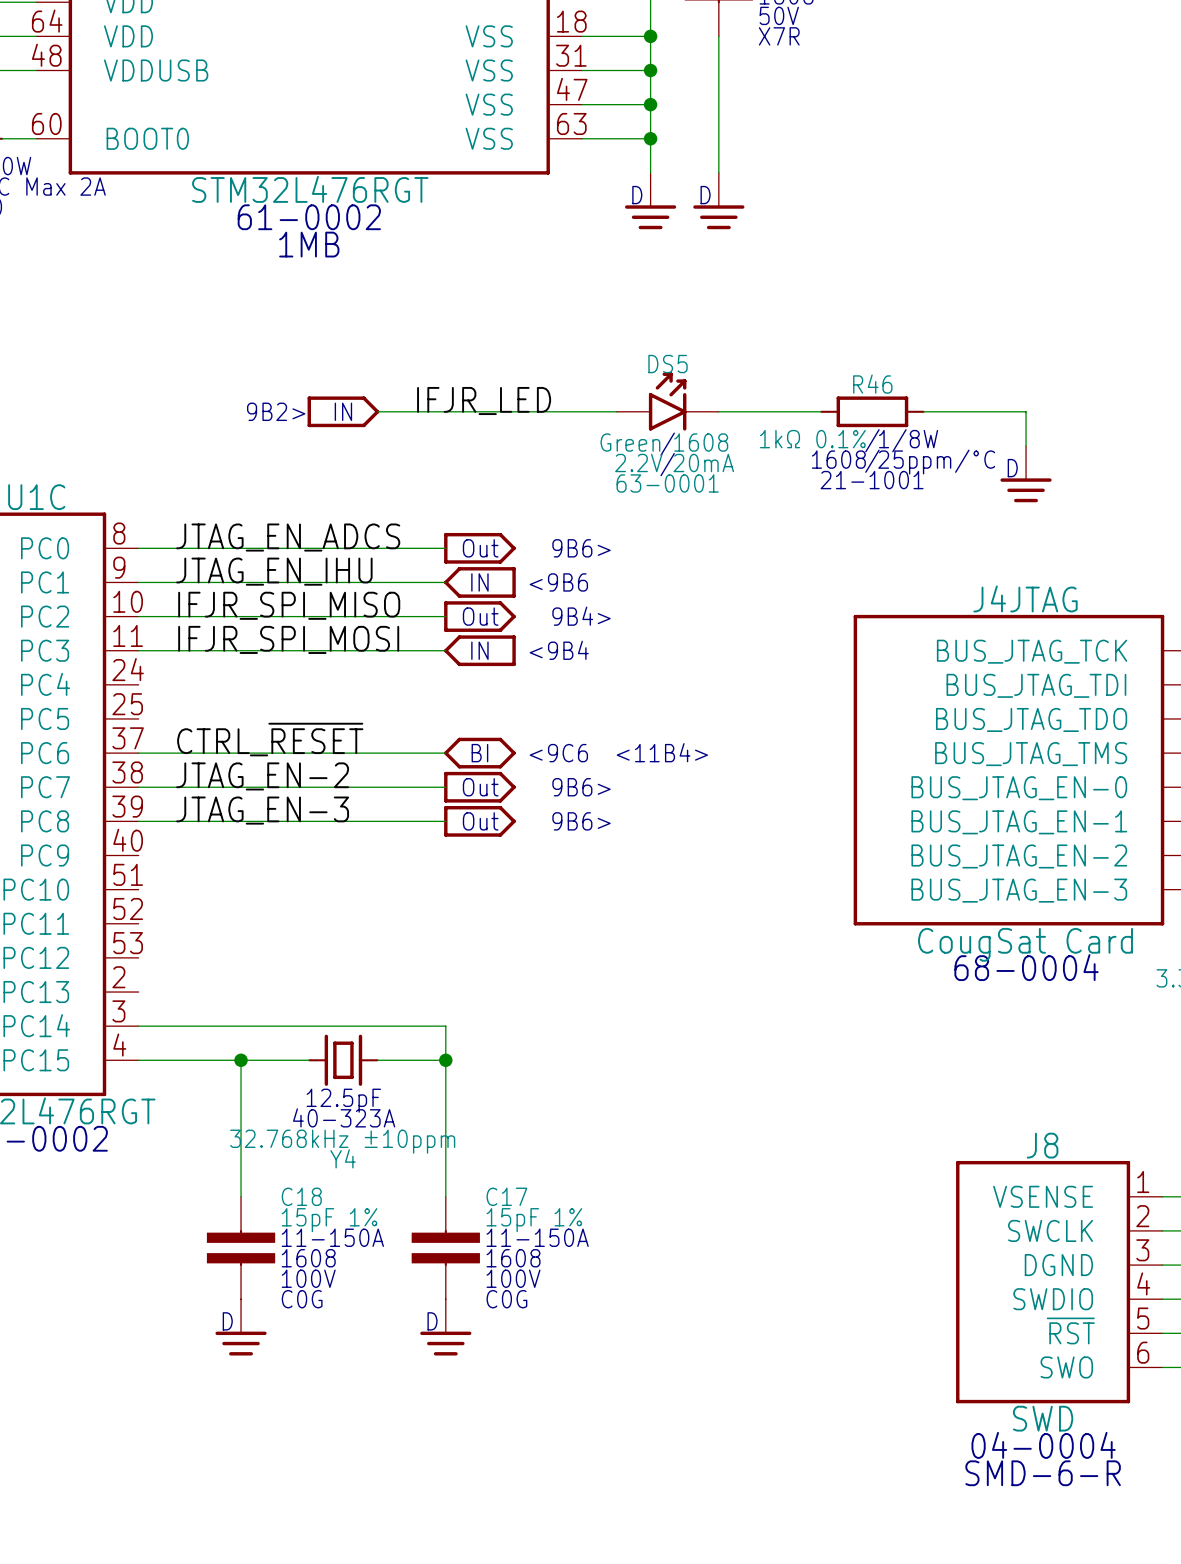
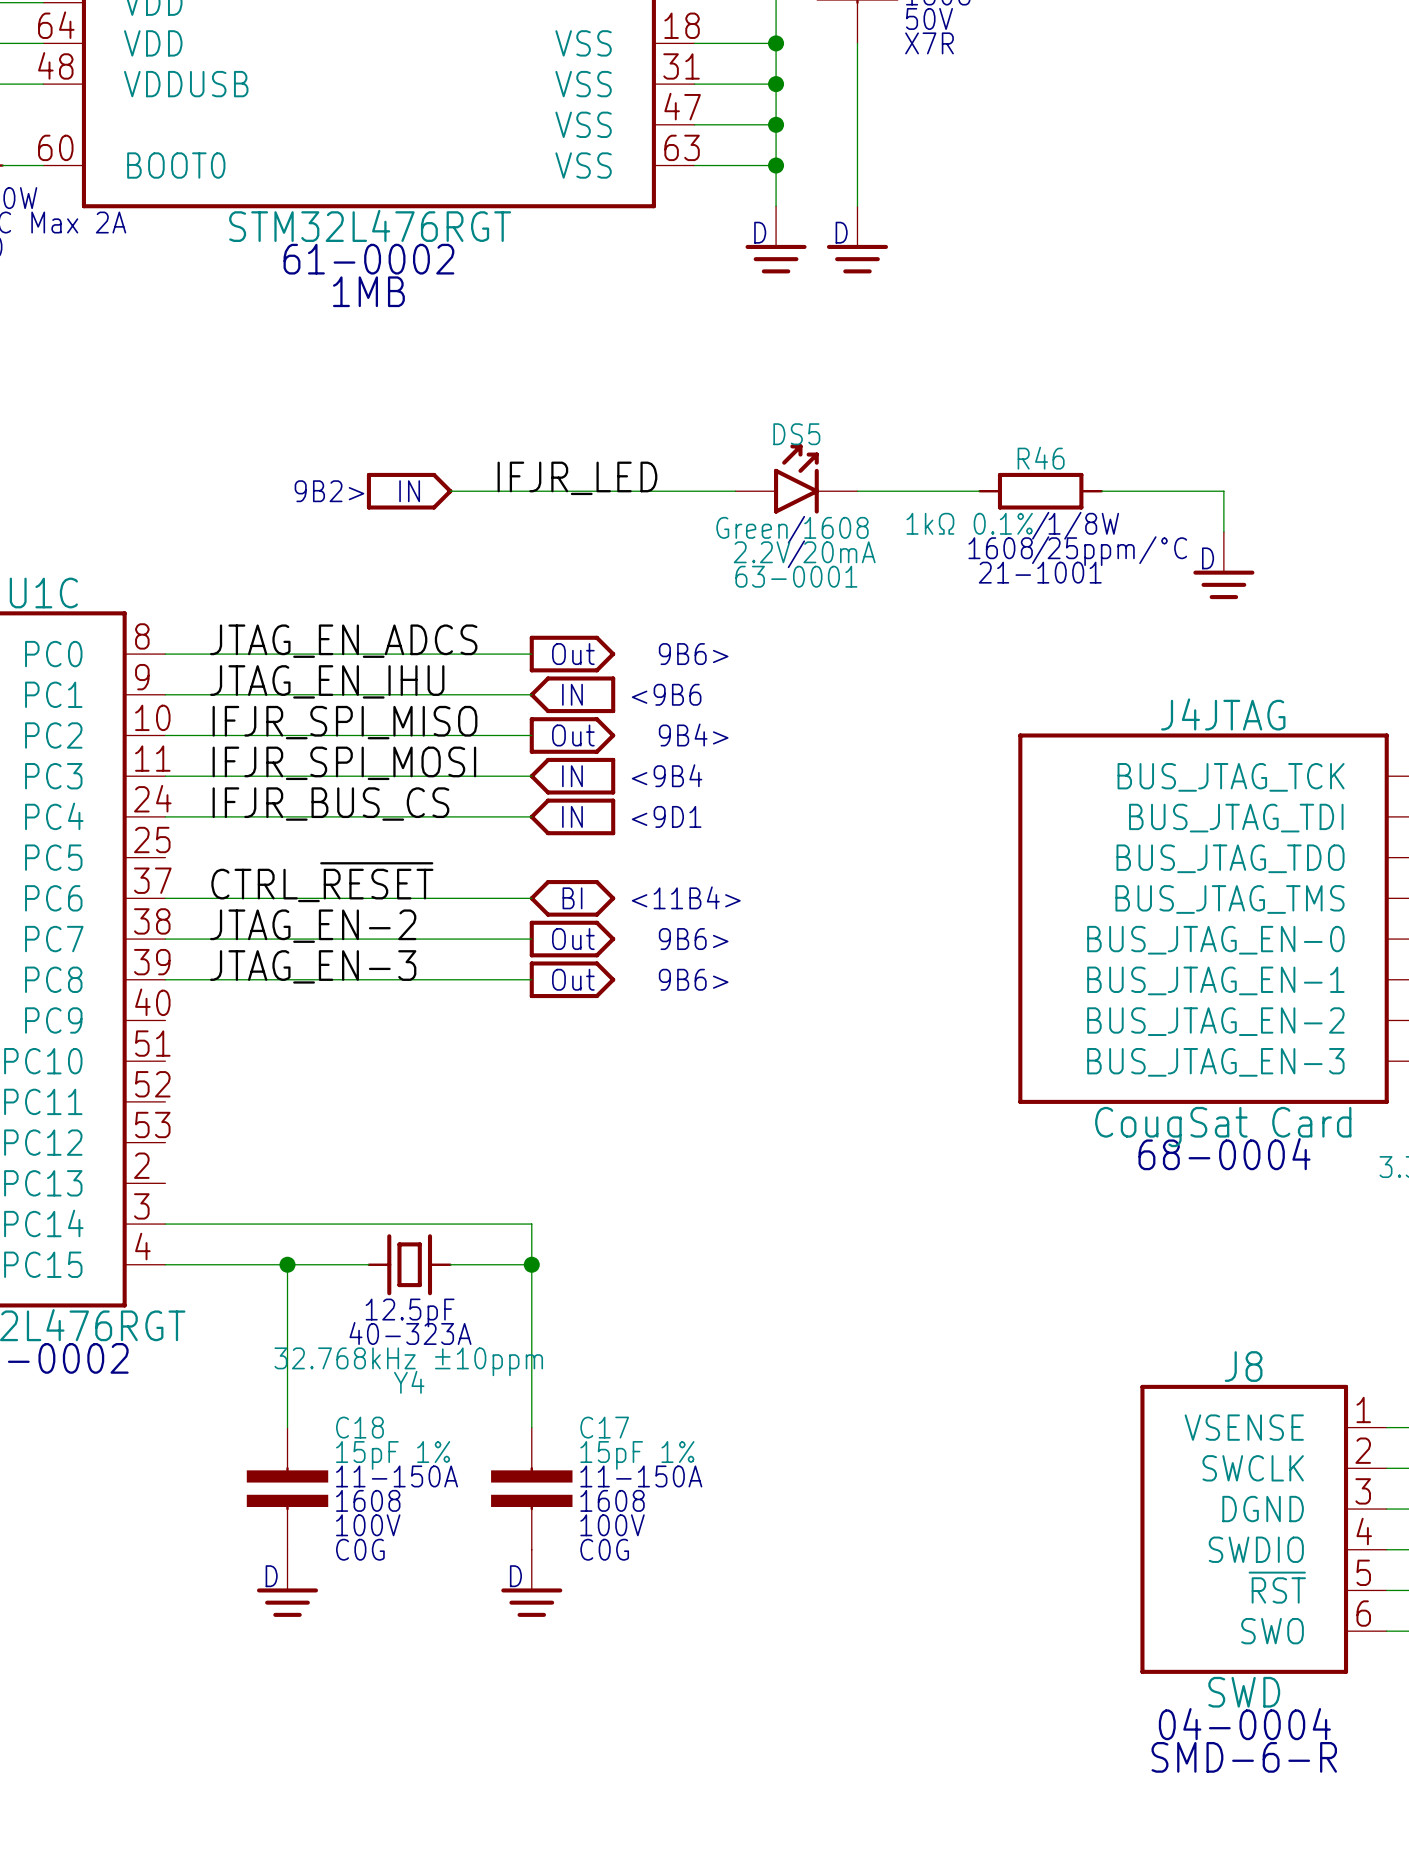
label: none -> IFJR_BUS_CS (330, 804)
wire: none -> (165, 816) (531, 816)
part: none -> (572, 816)
text: none -> <9D1 (666, 816)
text: <9C6 <11B4> (618, 752) -> <11B4> (686, 897)

